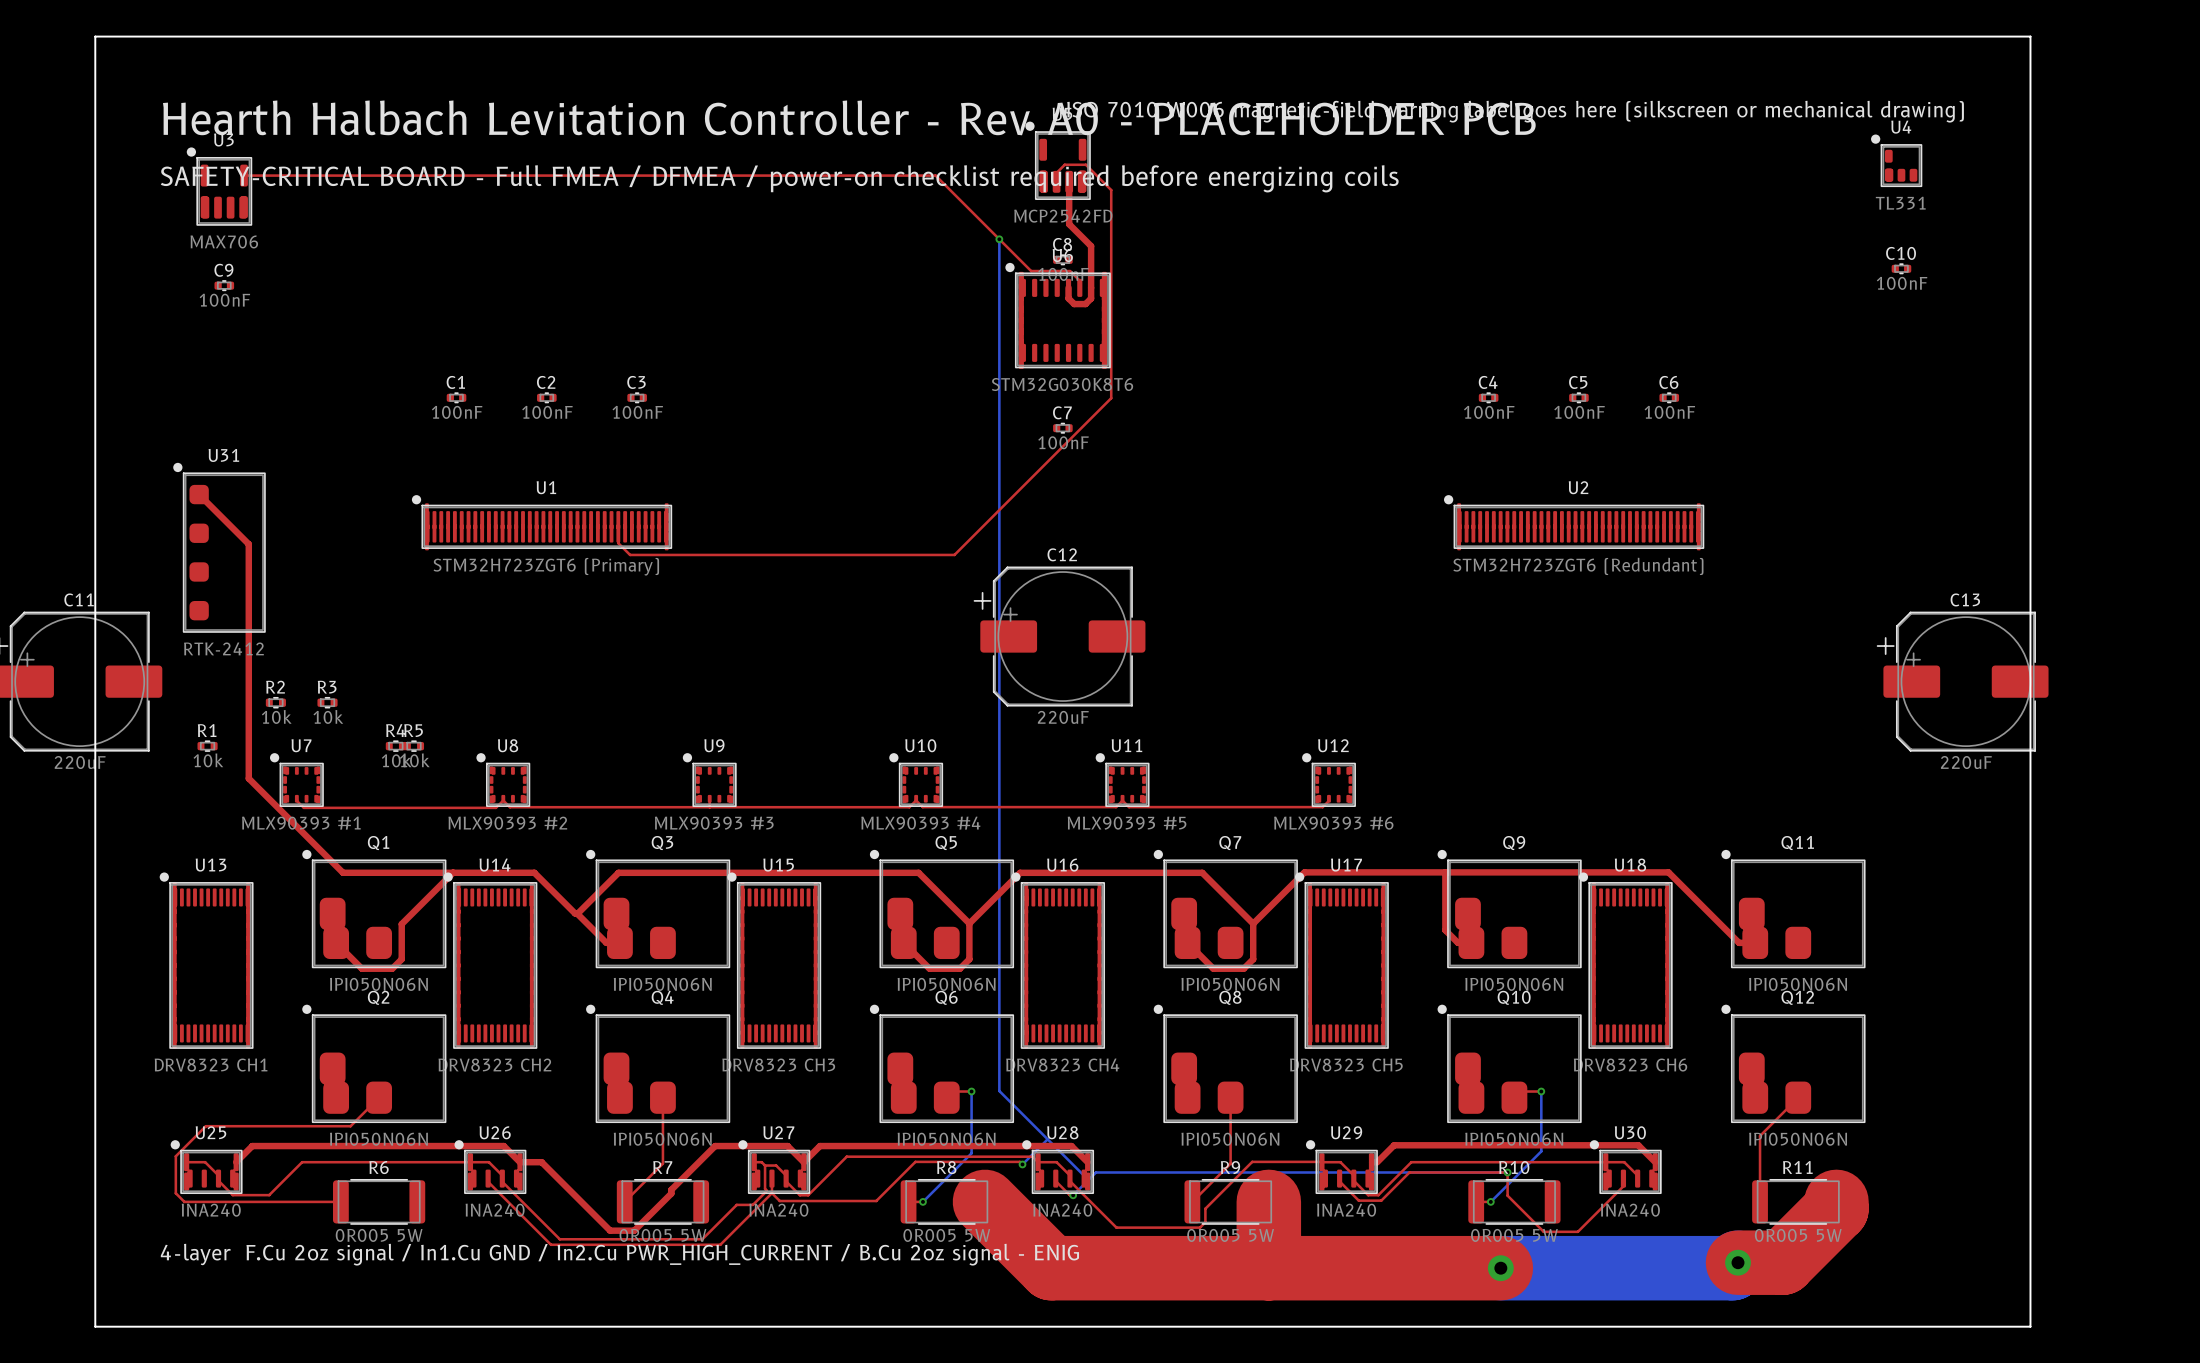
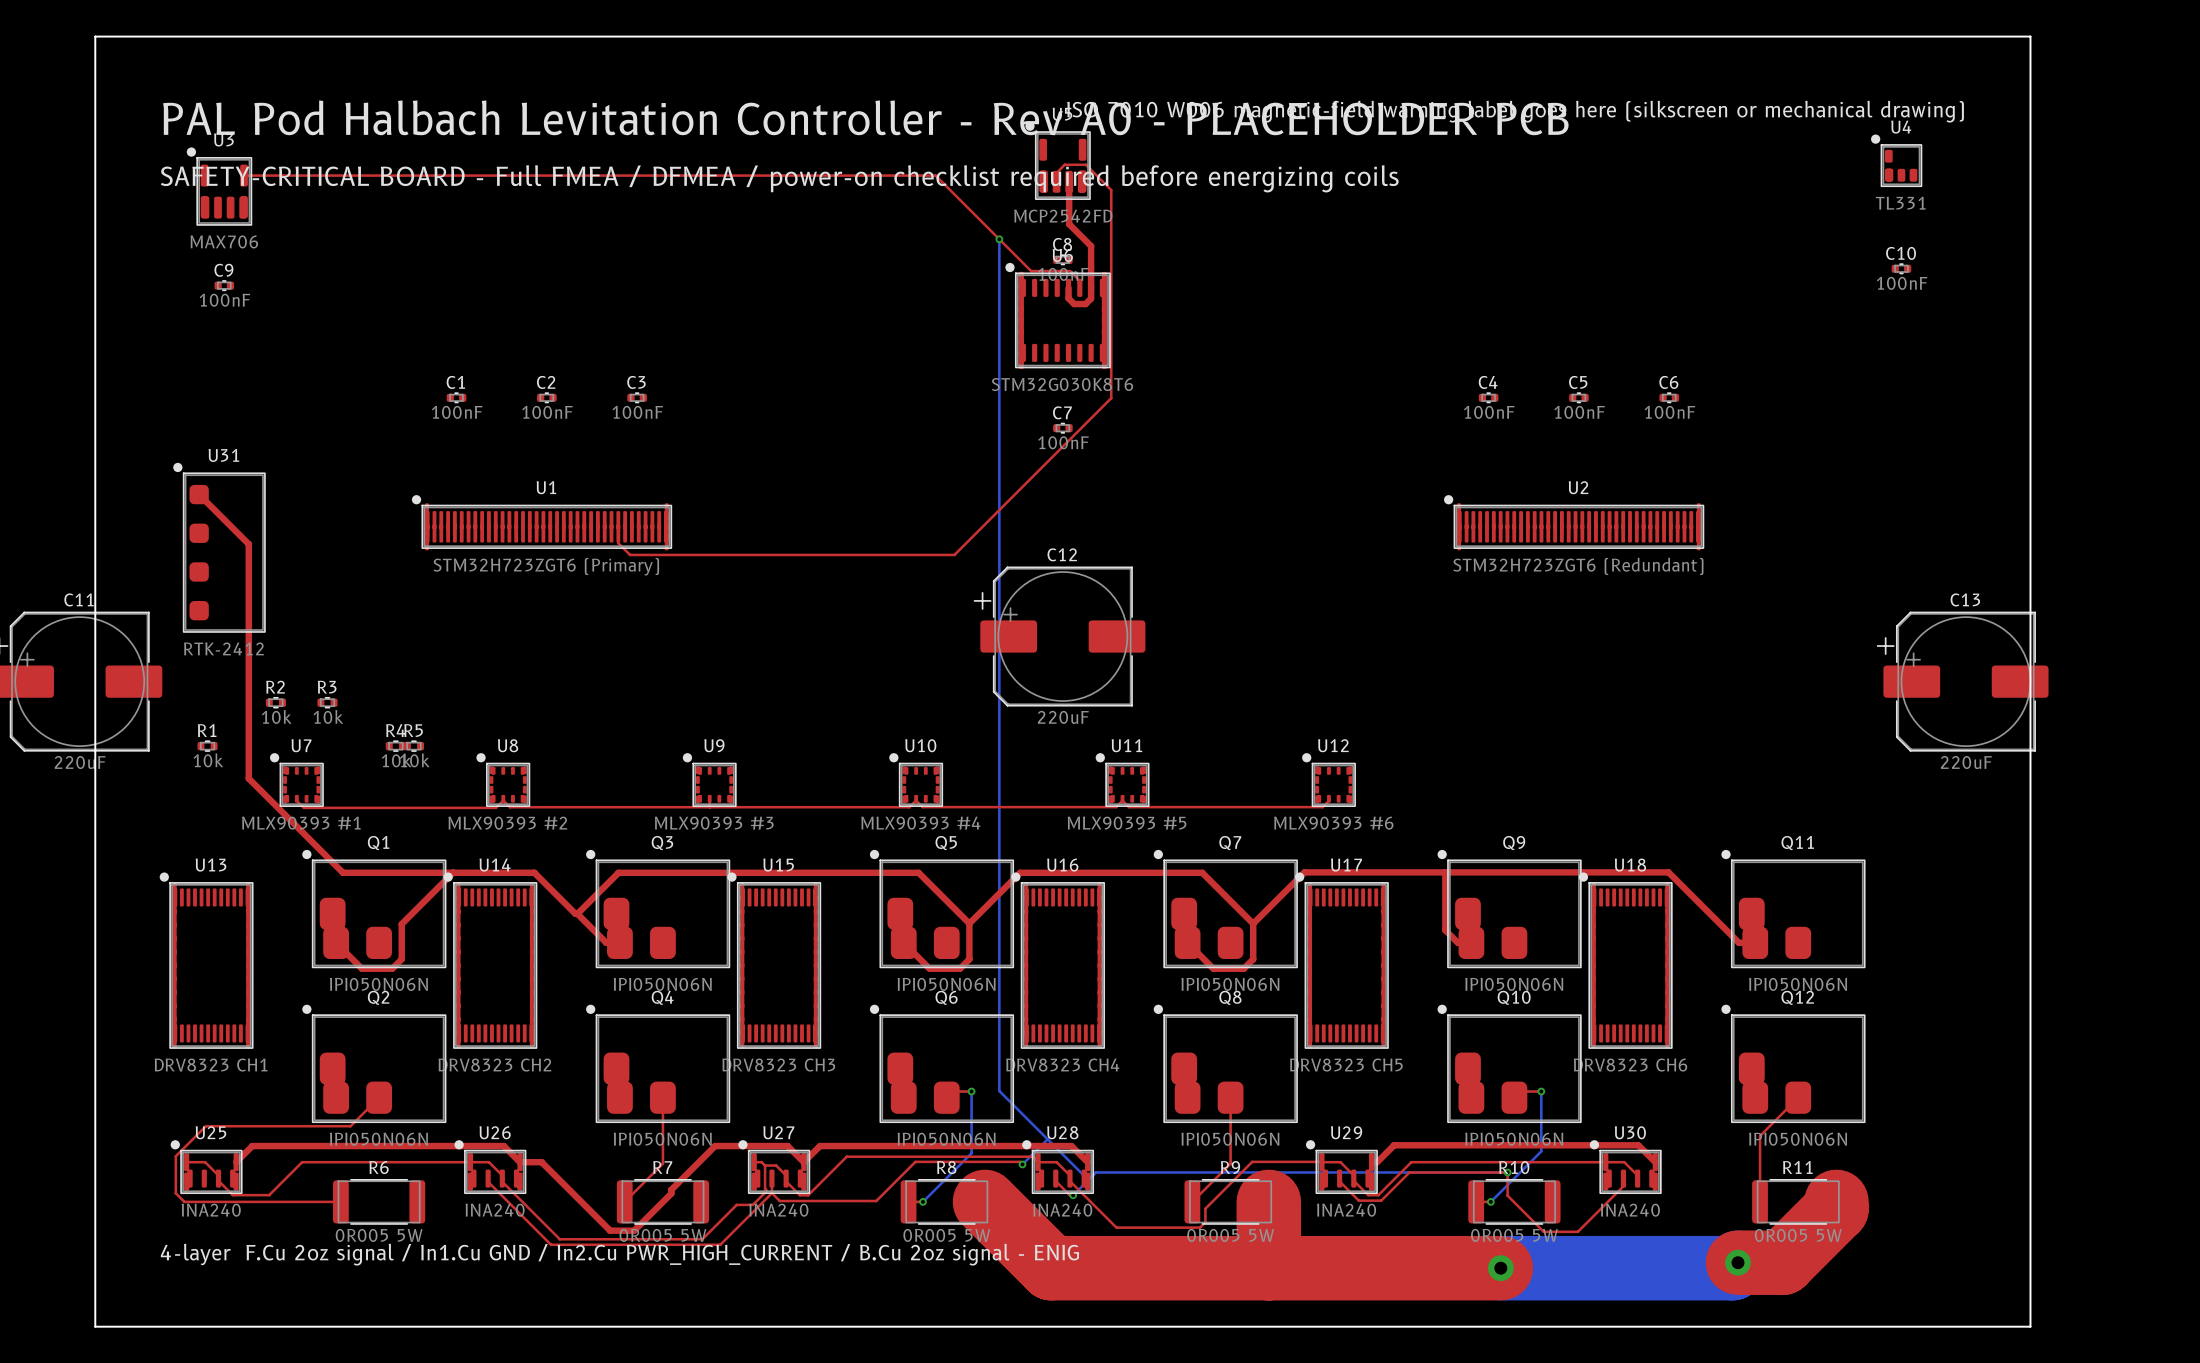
text: Hearth Halbach Levitation Controller - Rev A0 - PLACEHOLDER PCB (849, 117) -> PAL Pod Halbach Levitation Controller - Rev A0 - PLACEHOLDER PCB (865, 117)

